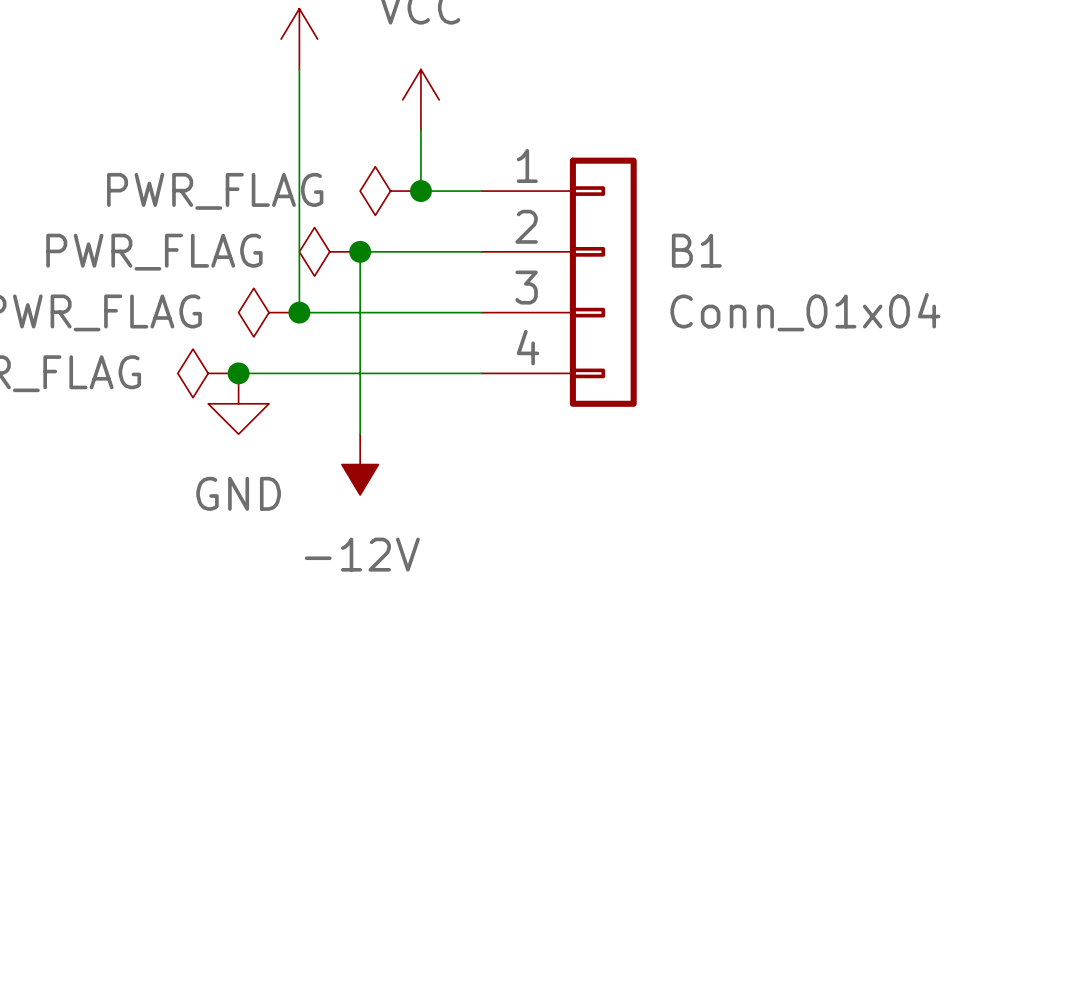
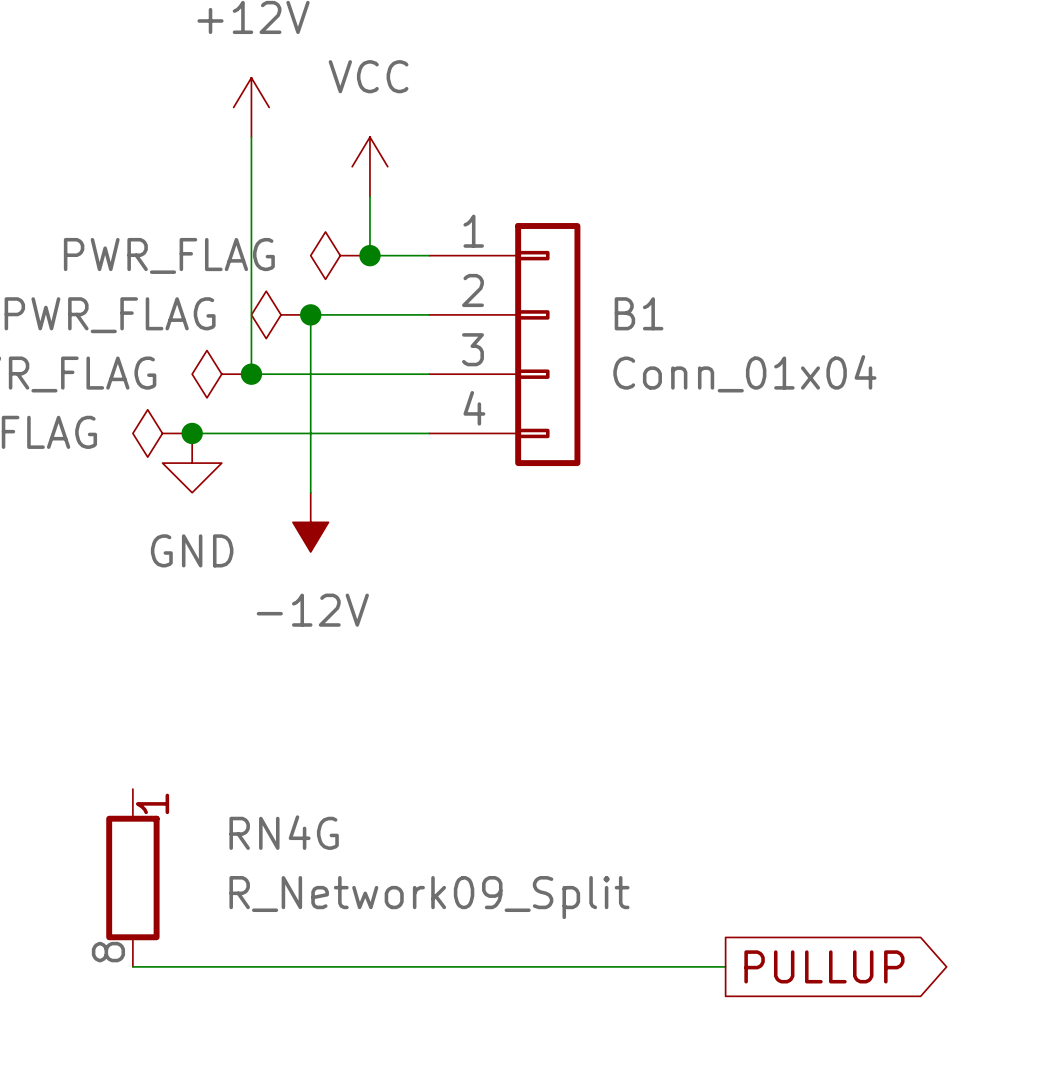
RN4G: none -> R_Network09_Split (132, 877)
wire: none -> (132, 966) (725, 966)
global label: none -> PULLUP (824, 966)

